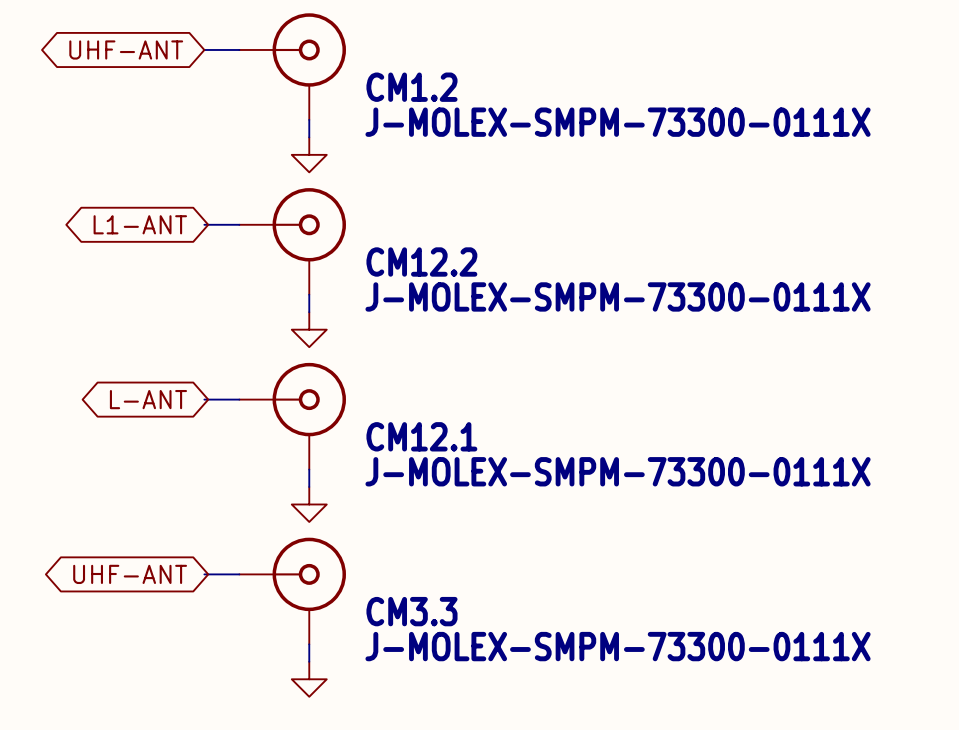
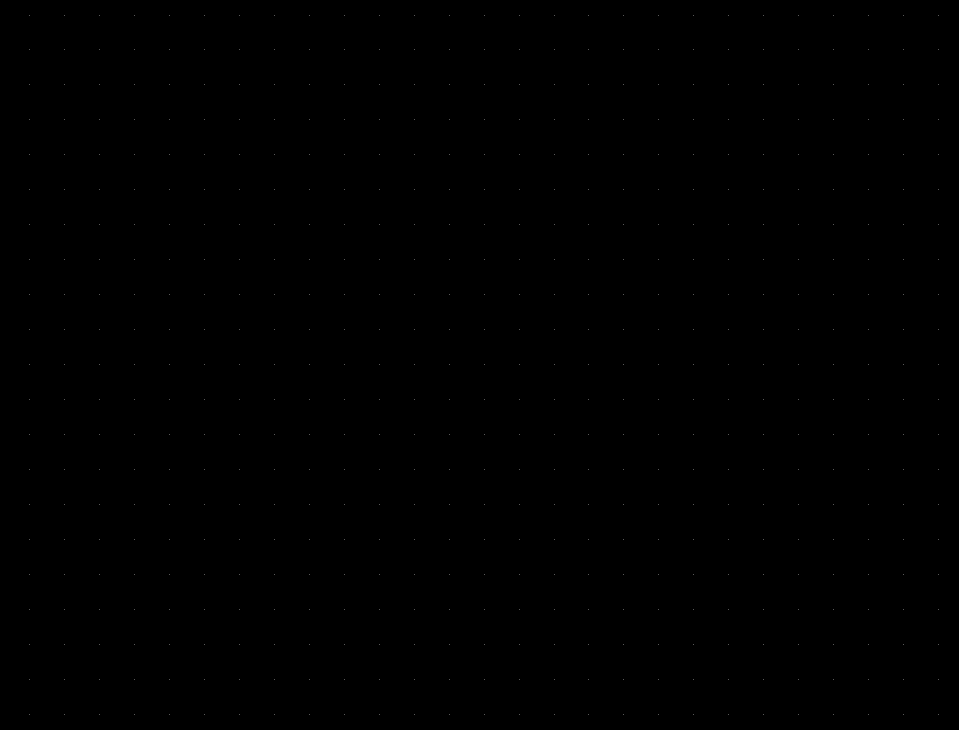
global label: UHF-ANT (126, 49) -> none
wire: (204, 49) (239, 49) -> none
CM1.2: J-MOLEX-SMPM-73300-0111X (292, 66) -> none
wire: (309, 119) (309, 137) -> none
power symbol: (309, 154) -> none
global label: L1-ANT (140, 224) -> none
wire: (204, 224) (239, 224) -> none
CM12.2: J-MOLEX-SMPM-73300-0111X (292, 241) -> none
wire: (309, 294) (309, 312) -> none
power symbol: (309, 329) -> none
global label: L-ANT (148, 399) -> none
wire: (204, 399) (239, 399) -> none
CM12.1: J-MOLEX-SMPM-73300-0111X (292, 416) -> none
wire: (309, 469) (309, 487) -> none
power symbol: (309, 504) -> none
global label: UHF-ANT (130, 574) -> none
wire: (204, 574) (239, 574) -> none
CM3.3: J-MOLEX-SMPM-73300-0111X (292, 591) -> none
wire: (309, 644) (309, 661) -> none
power symbol: (309, 679) -> none

